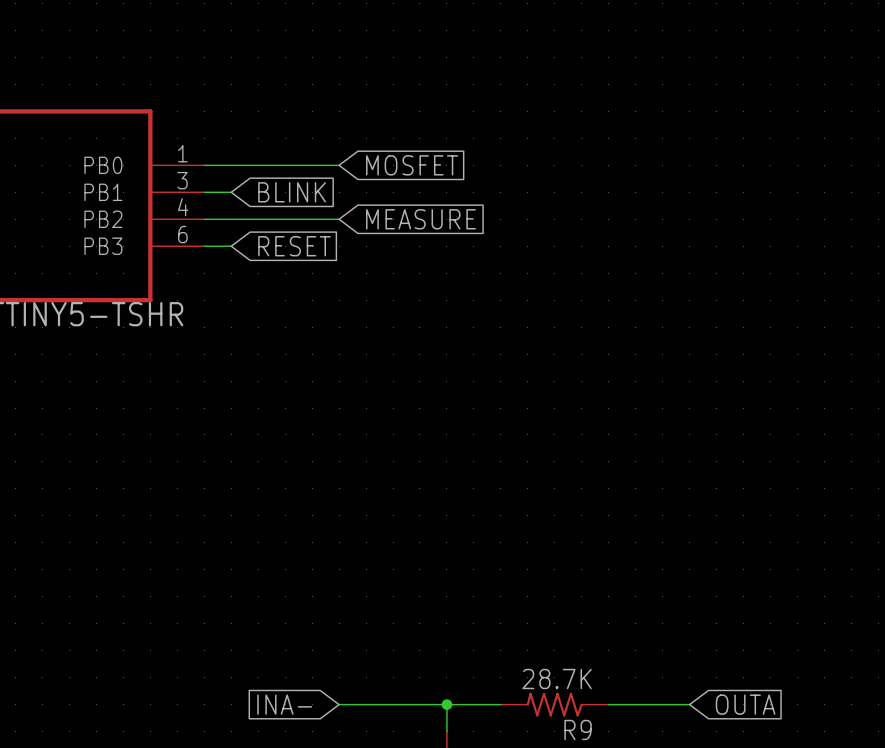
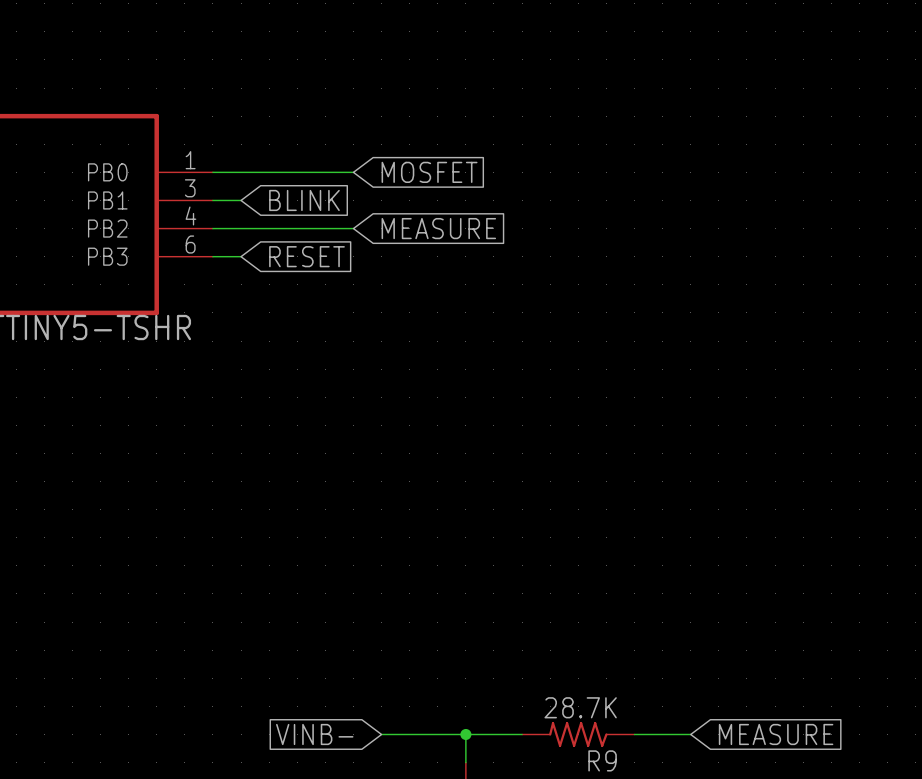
global label: INA- (284, 704) -> VINB- (314, 734)
wire: (339, 704) (366, 704) -> none
wire: (662, 704) (689, 704) -> none
global label: none -> MEASURE (776, 734)
global label: OUTA (745, 704) -> none

